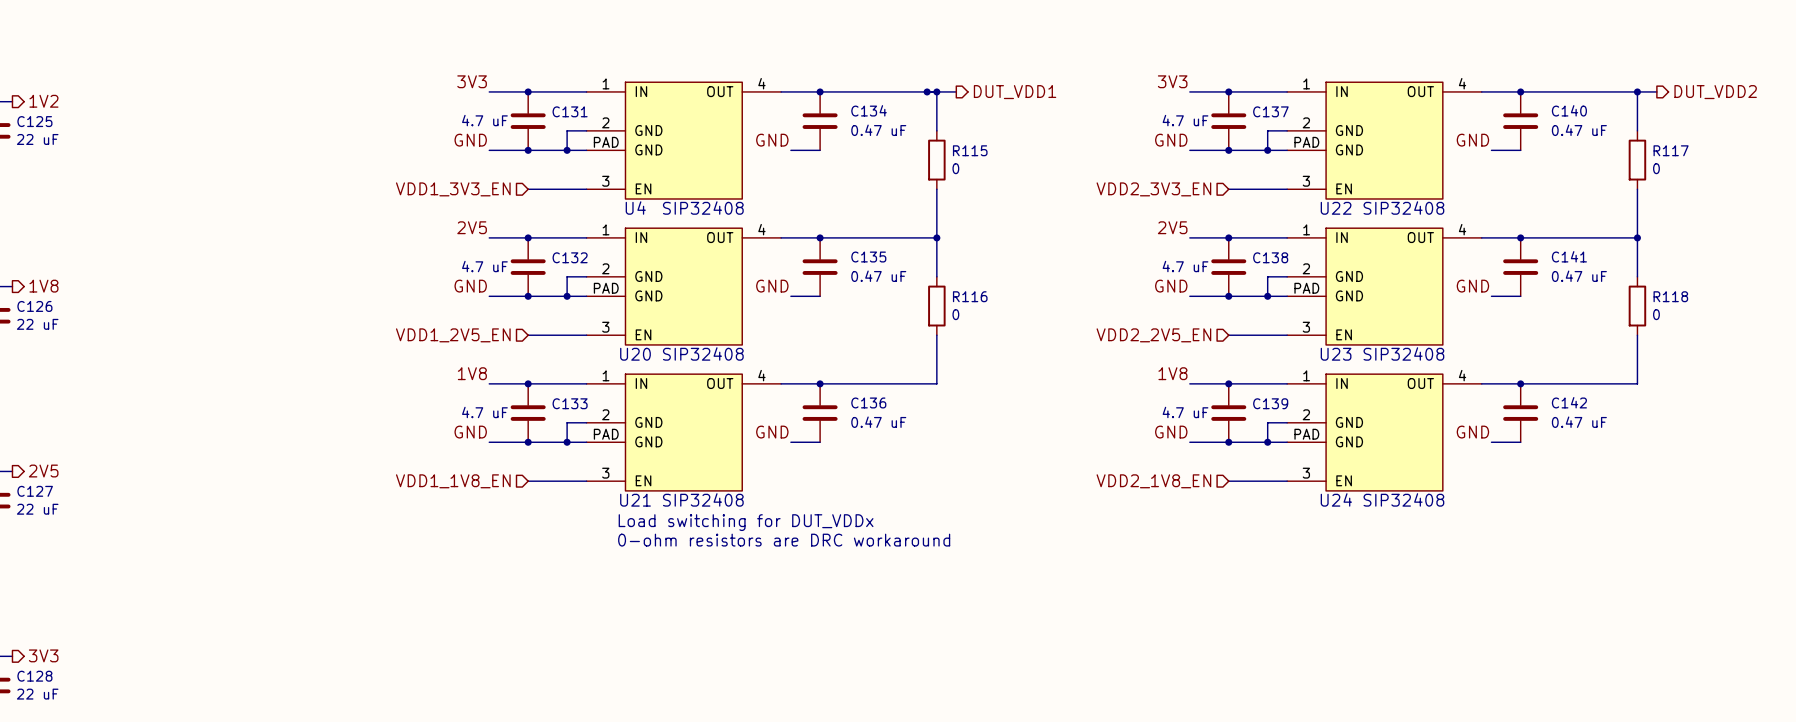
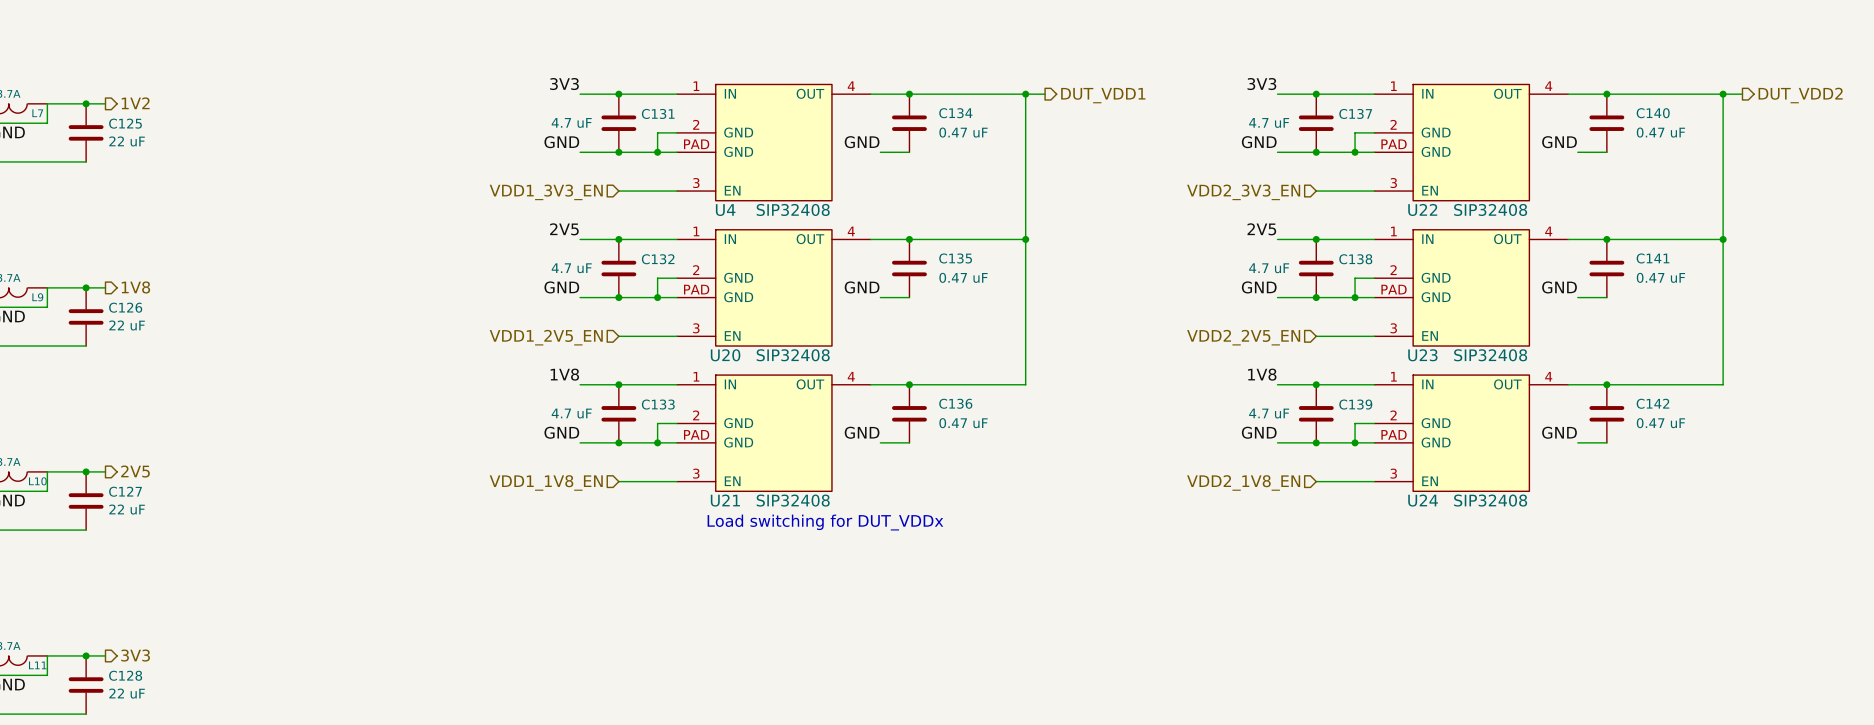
junction: (927, 91) -> none
wire: none -> (1025, 132) (1025, 191)
wire: none -> (1723, 132) (1723, 191)
R115: 0 (936, 160) -> none
R117: 0 (1637, 160) -> none
wire: none -> (1025, 278) (1025, 336)
wire: none -> (1723, 278) (1723, 336)
R116: 0 (936, 306) -> none
R118: 0 (1637, 306) -> none
text: 0-ohm resistors are DRC workaround (784, 540) -> none

